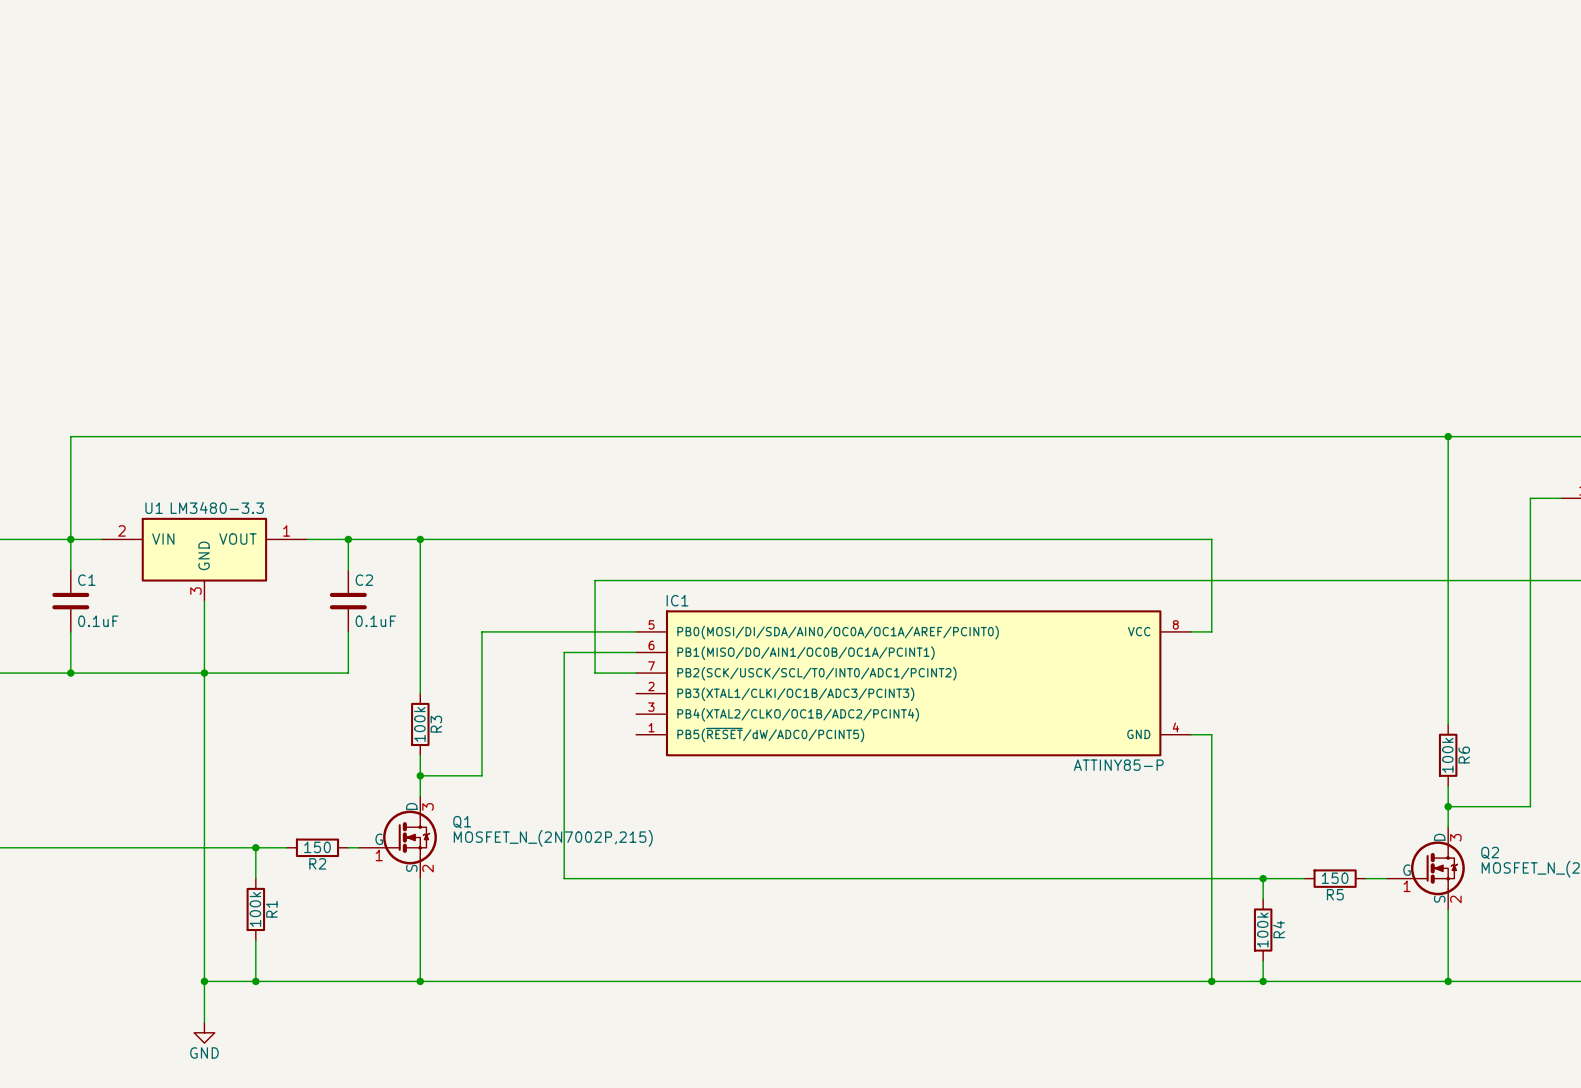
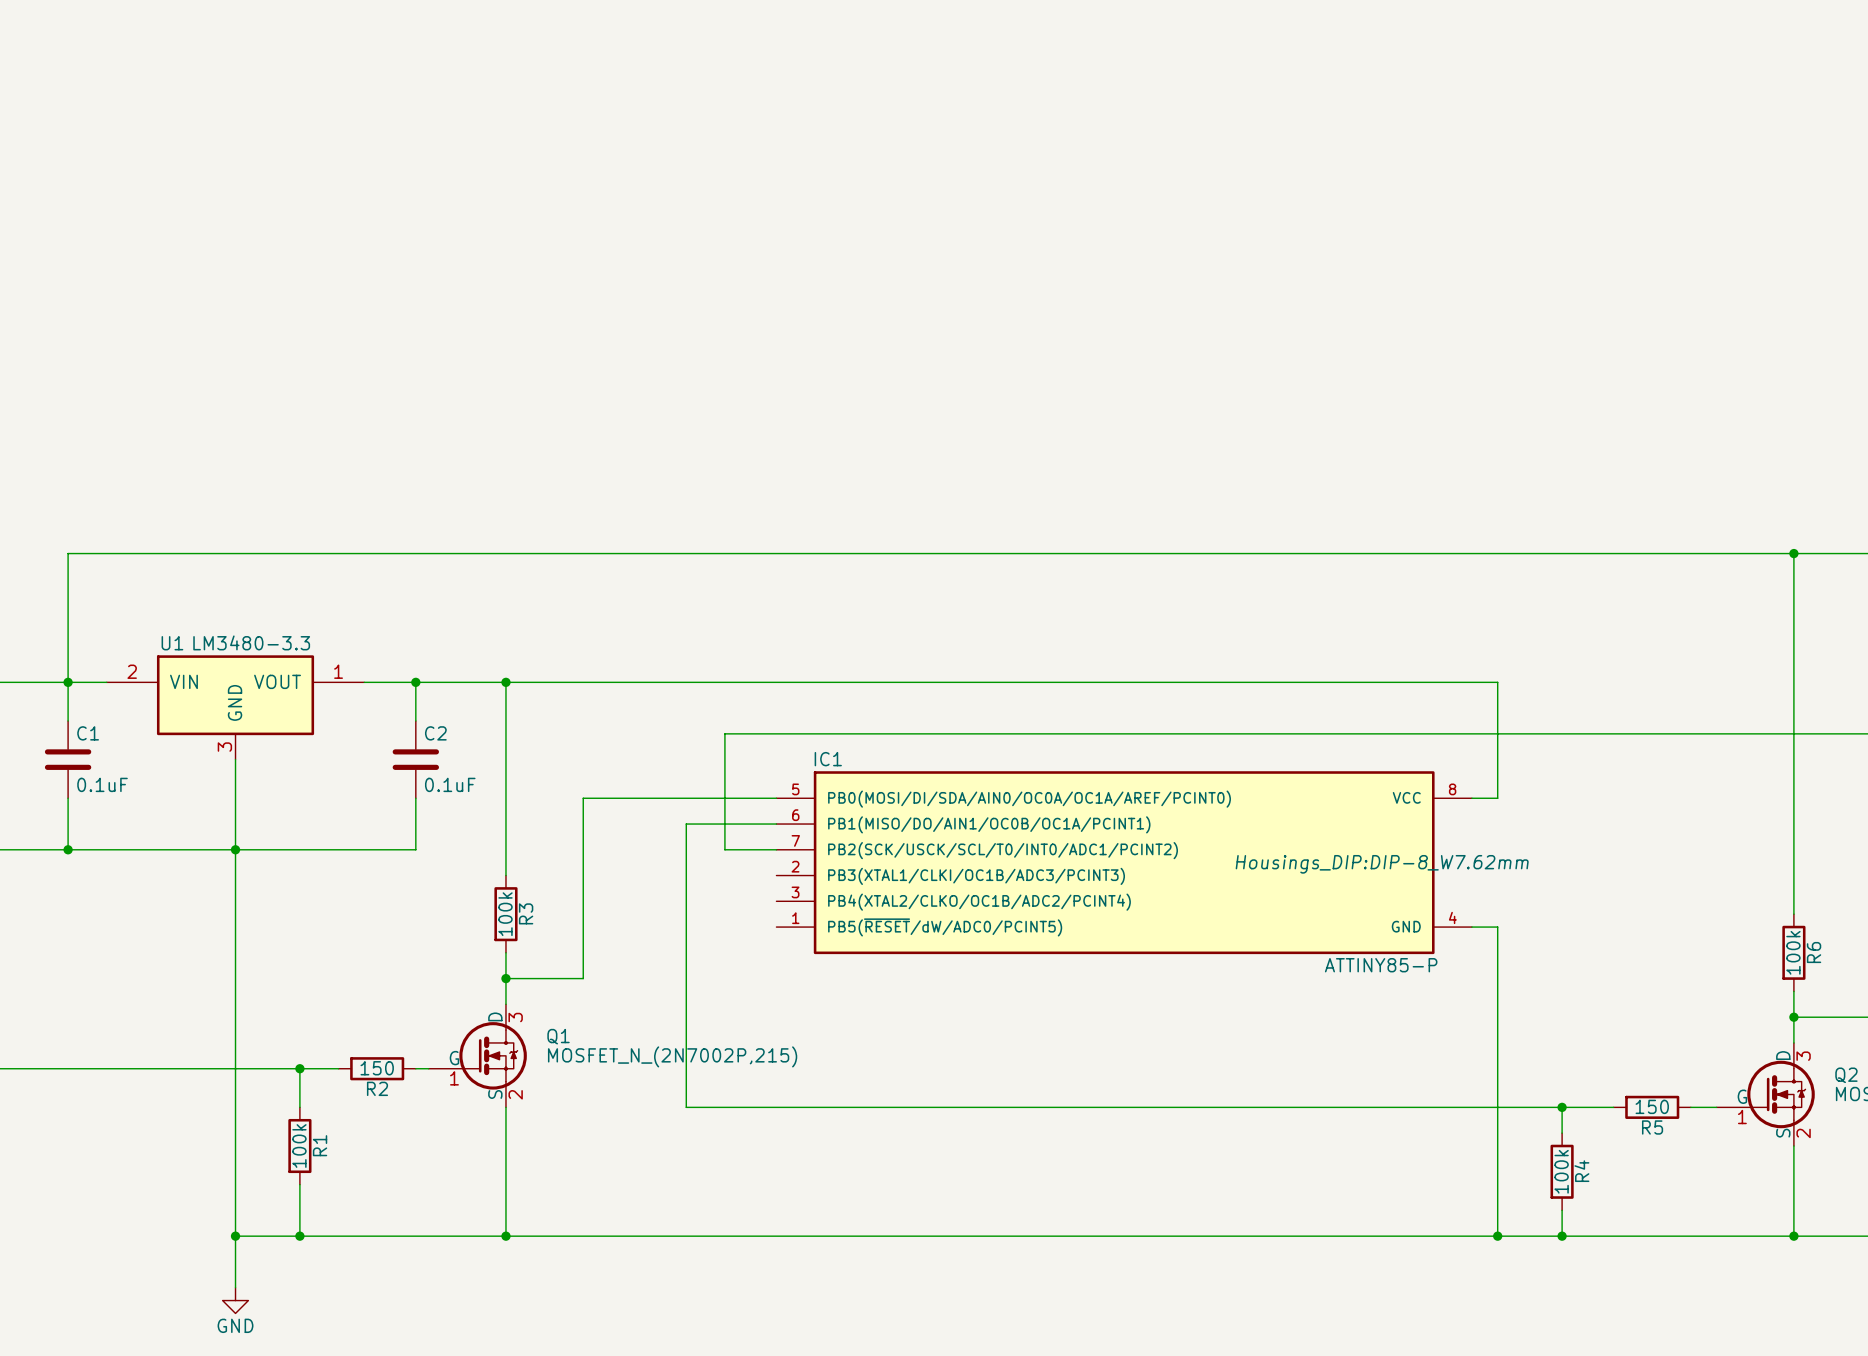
IC1 text: none -> Housings_DIP:DIP-8_W7.62mm (1382, 864)

